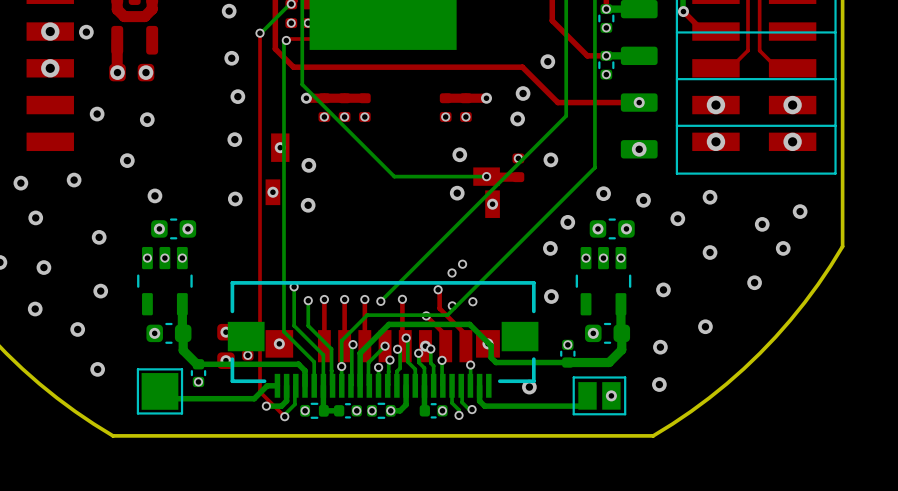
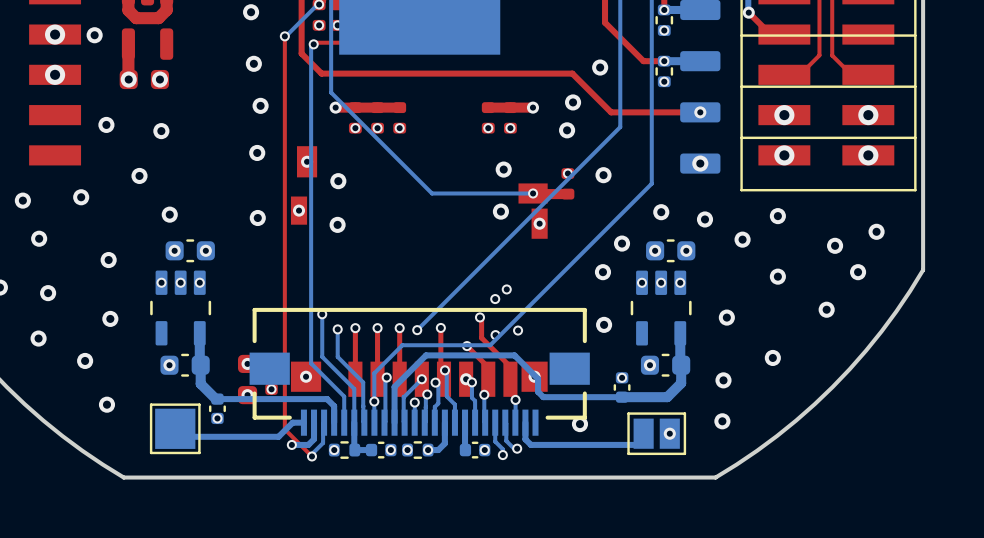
bottom track: (418, 353) (418, 362) (424, 368) (424, 385) -> none
via: (418, 353) -> none

